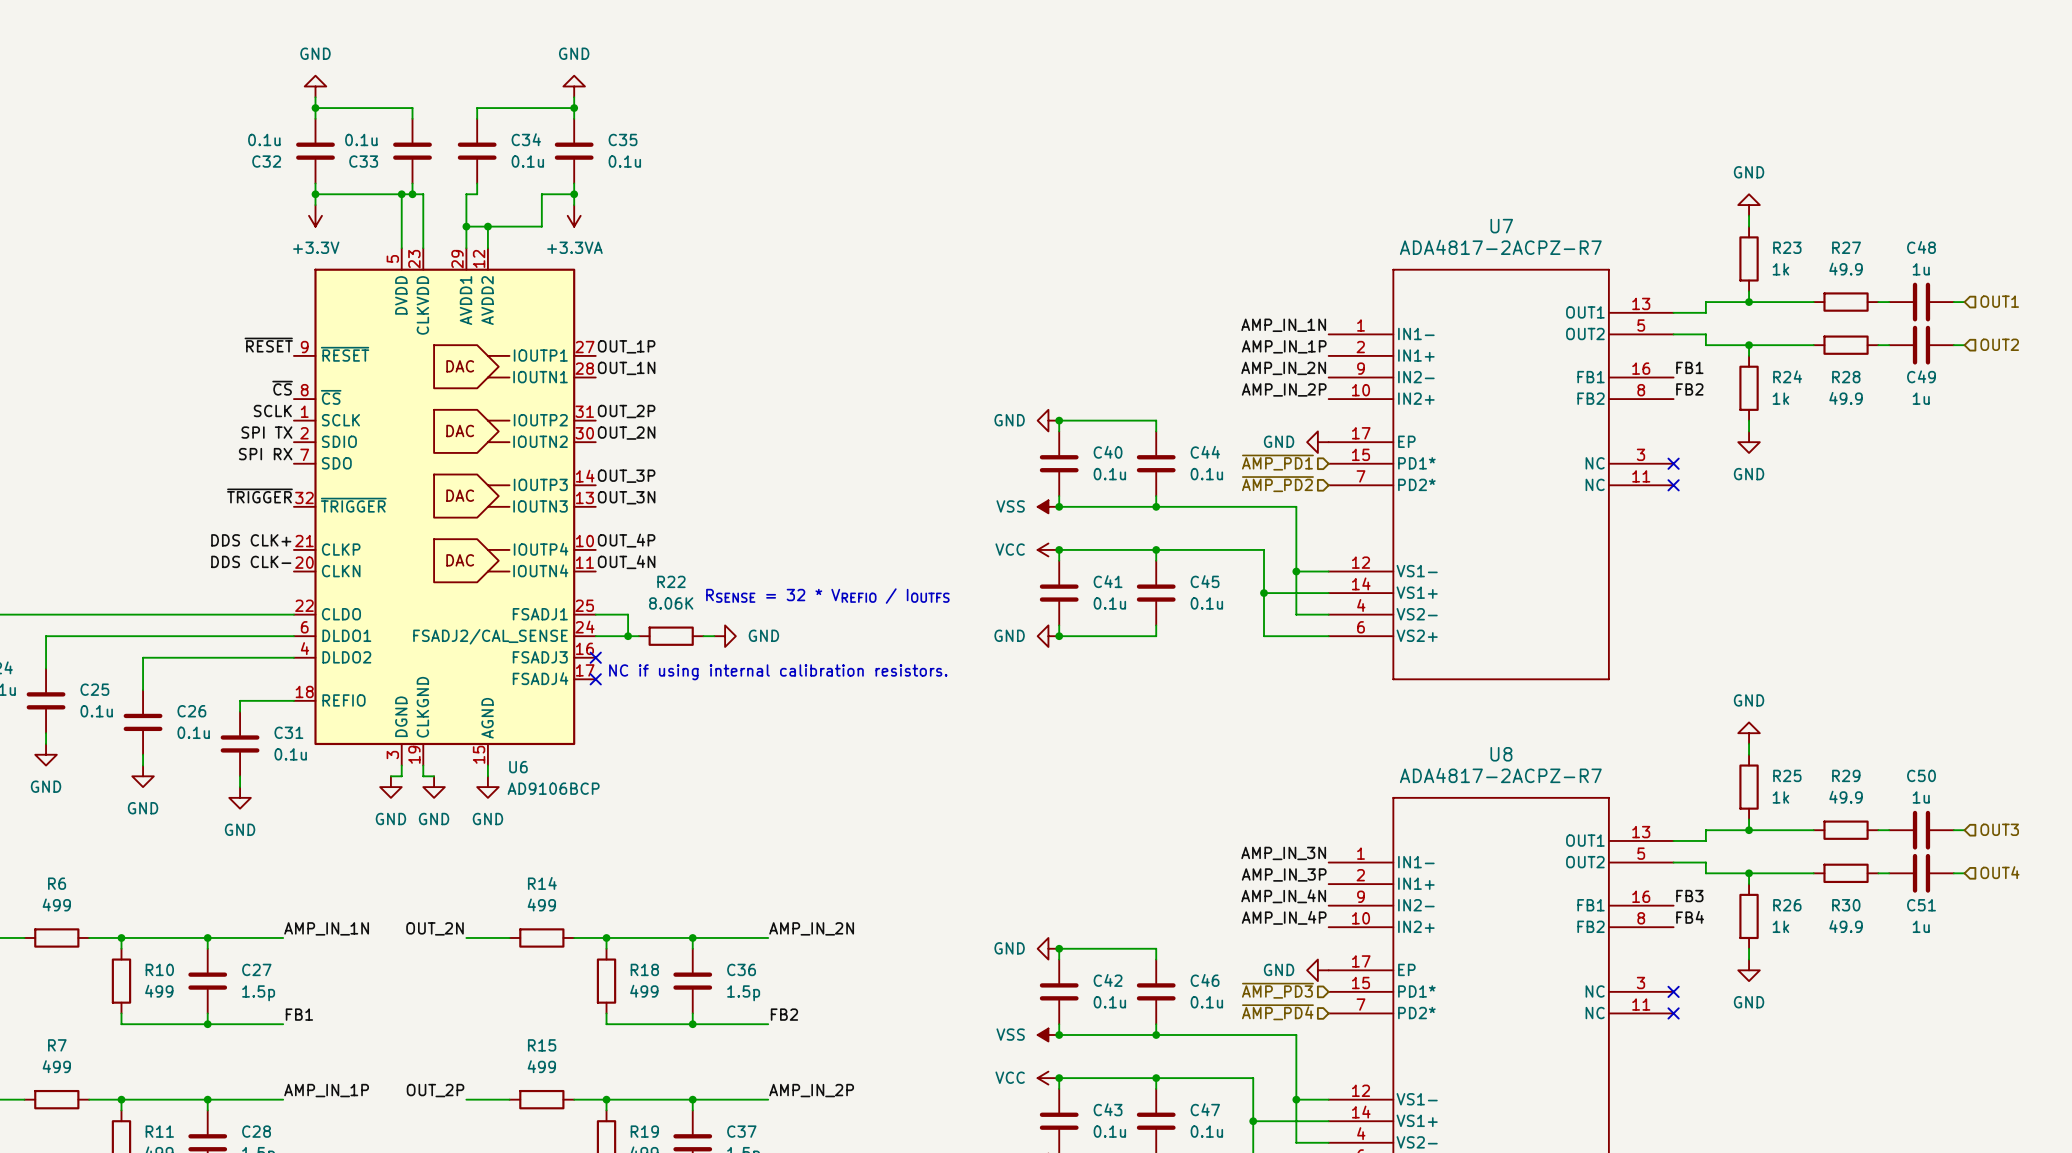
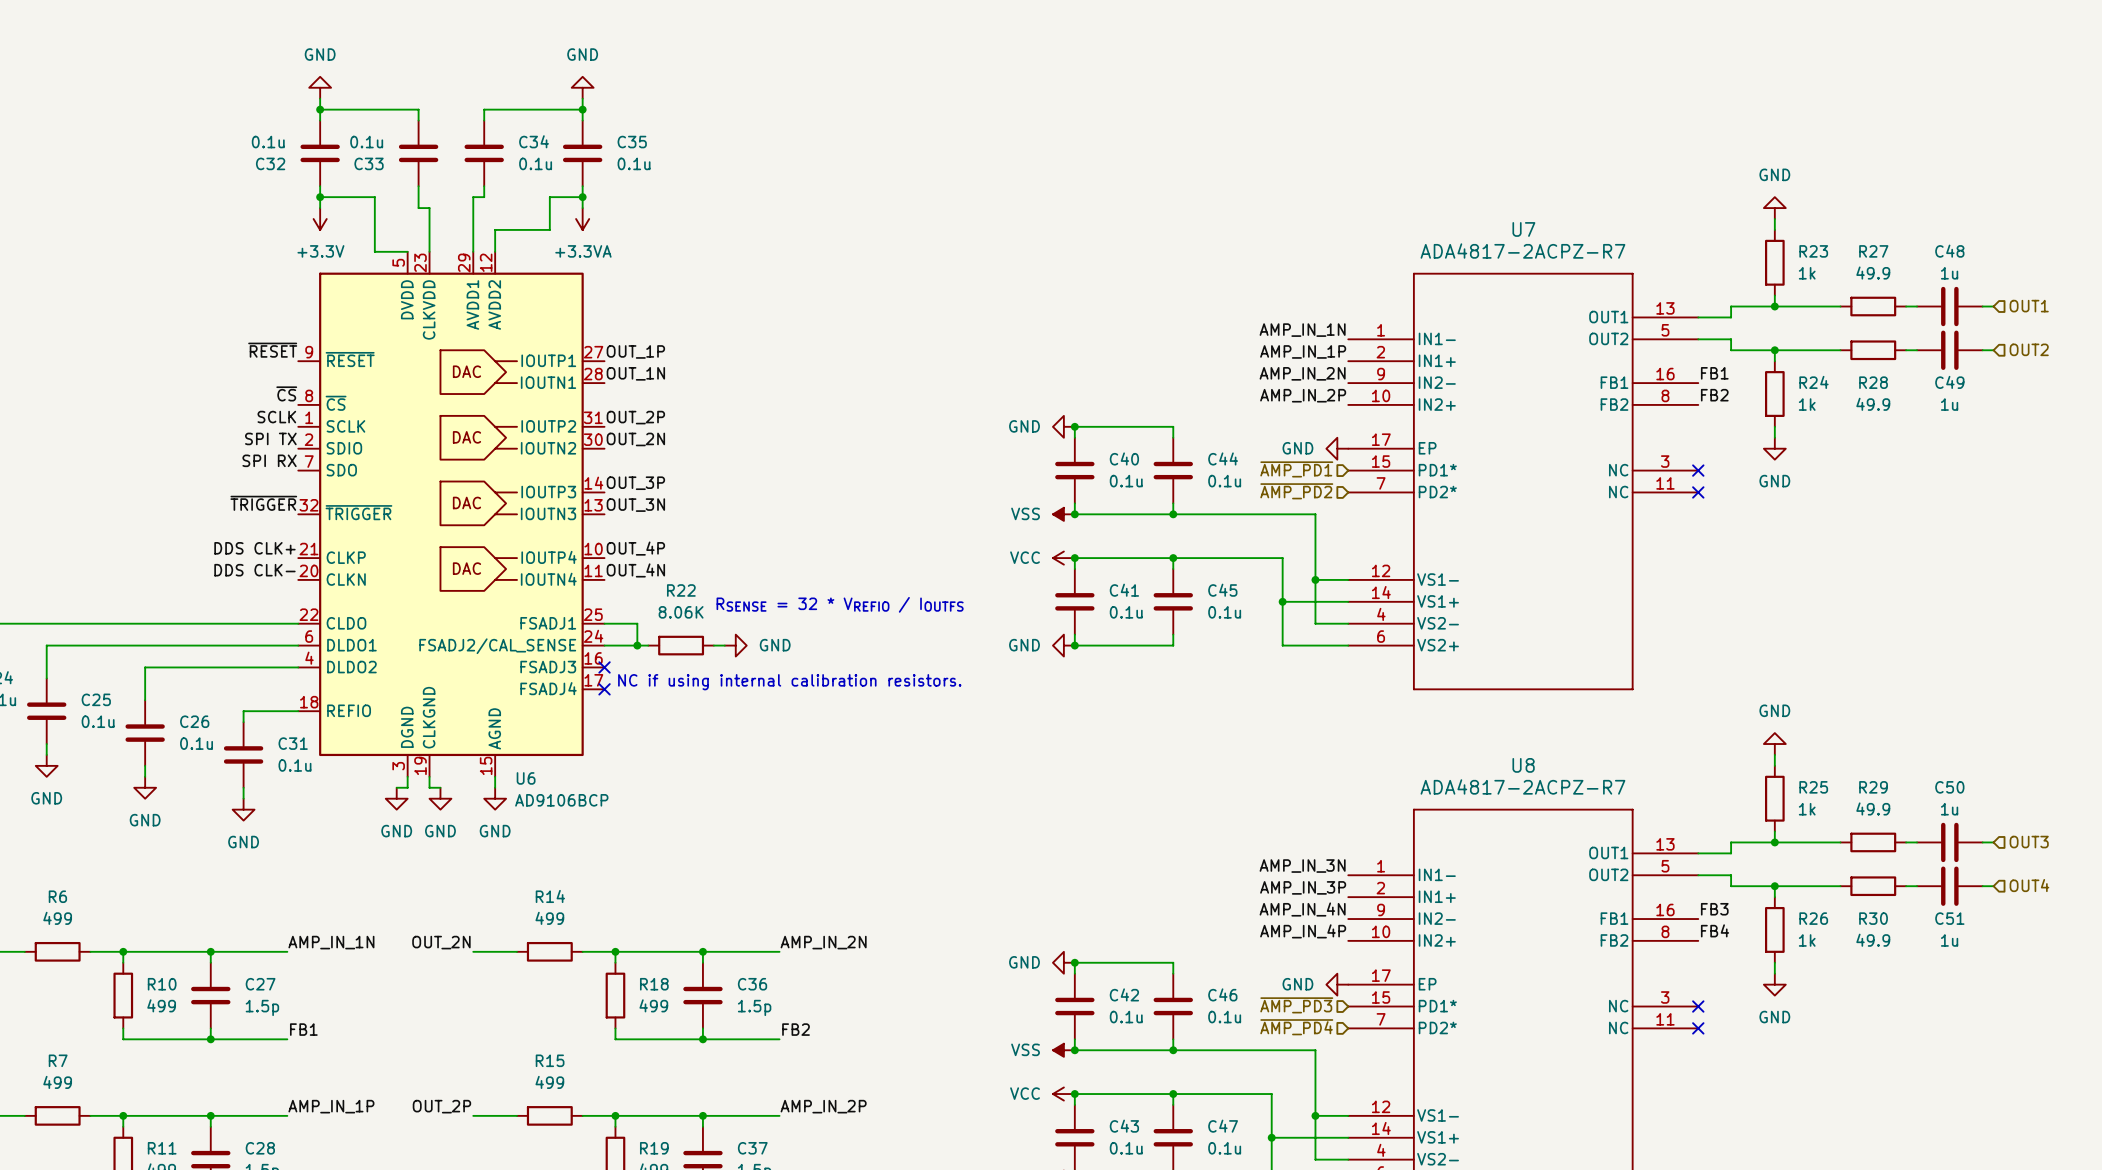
wire: (369, 194) (423, 194) (423, 205) -> (418, 197) (418, 208) (429, 208)
wire: (401, 194) (401, 248) -> (374, 197) (374, 251) (407, 251)
junction: (401, 194) -> none
junction: (412, 194) -> none
wire: (466, 226) (487, 226) -> none
junction: (466, 226) -> none
junction: (487, 226) -> none

